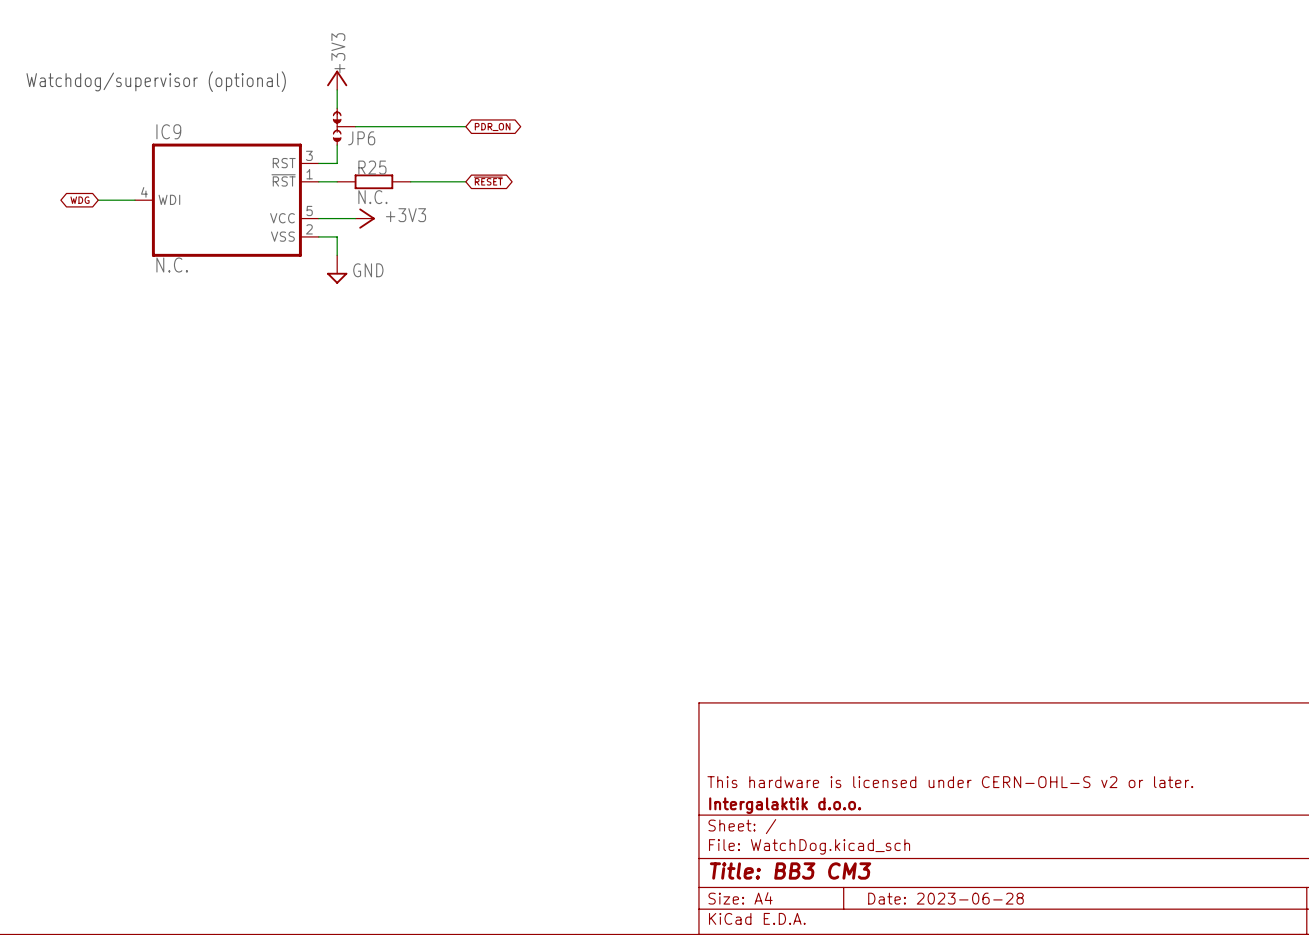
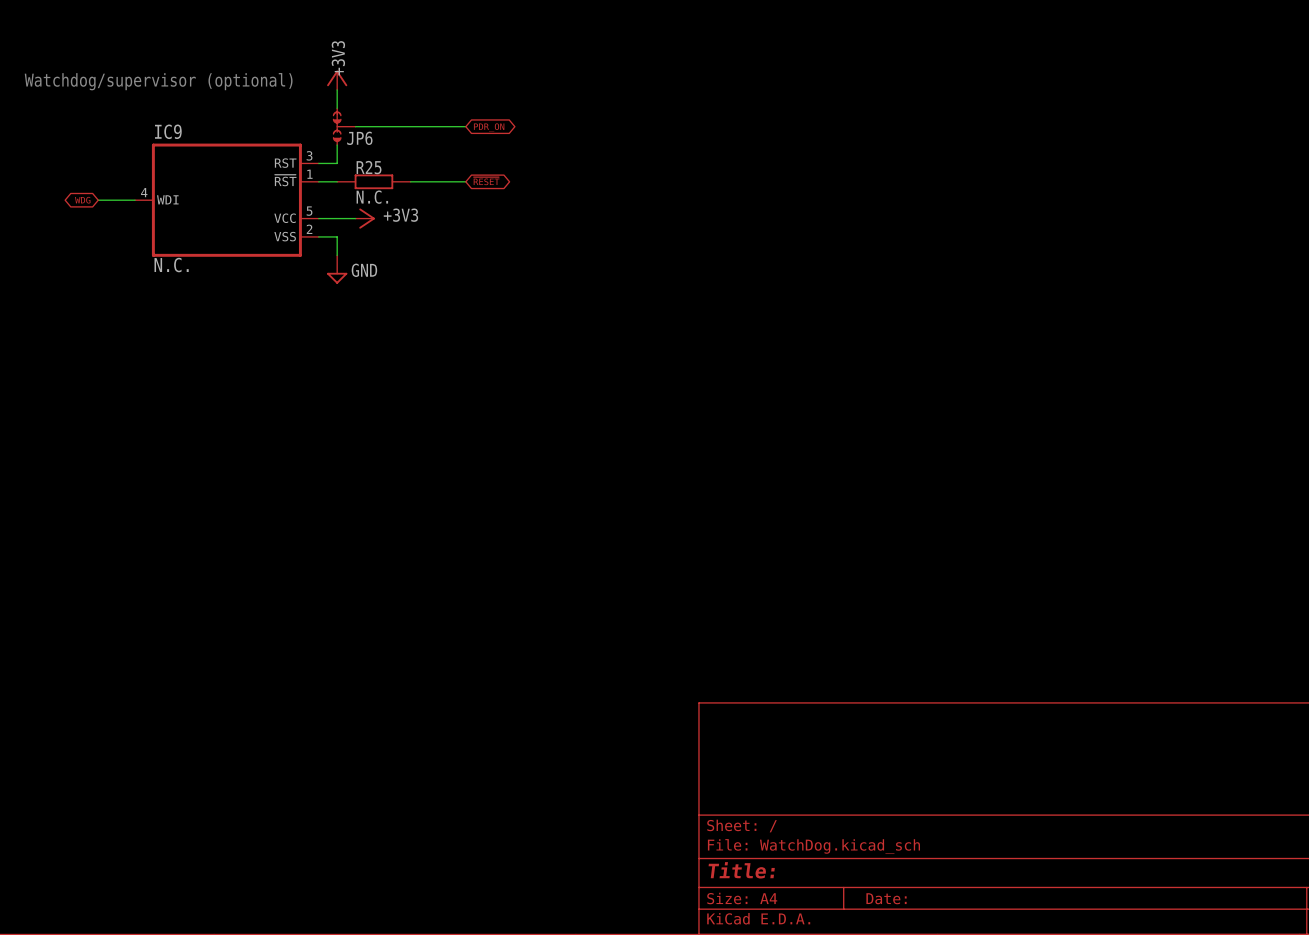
title block: This hardware is licensed under CERN-OHL-S v2 or later. (950, 782) -> none
title block: Intergalaktik d.o.o. (785, 805) -> none
title block: Title: BB3 CM3 (790, 871) -> Title: (741, 870)
title block: Date: 2023-06-28 (945, 898) -> Date: (886, 898)

